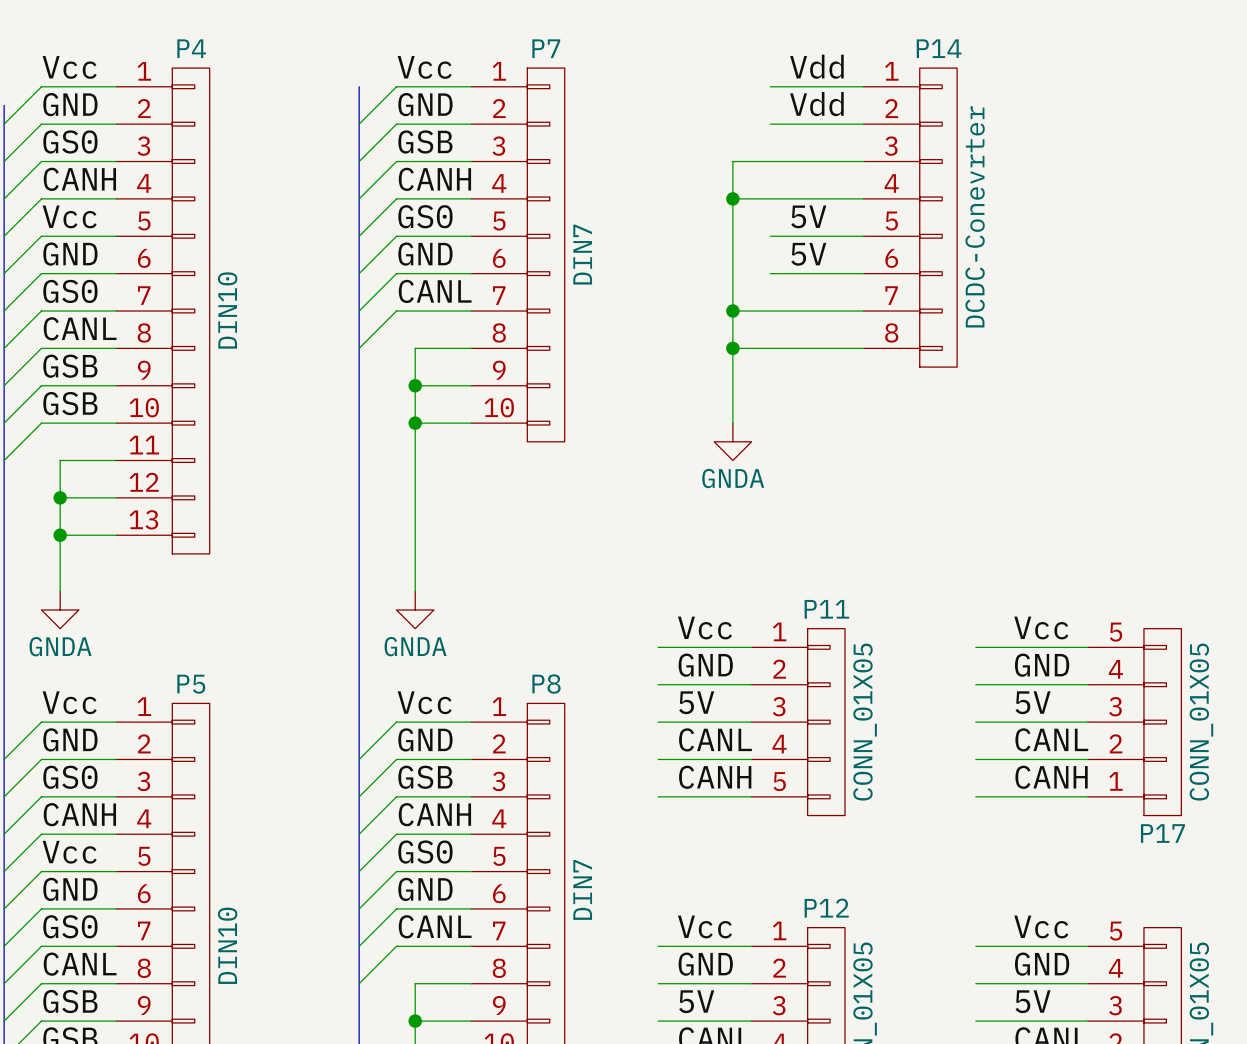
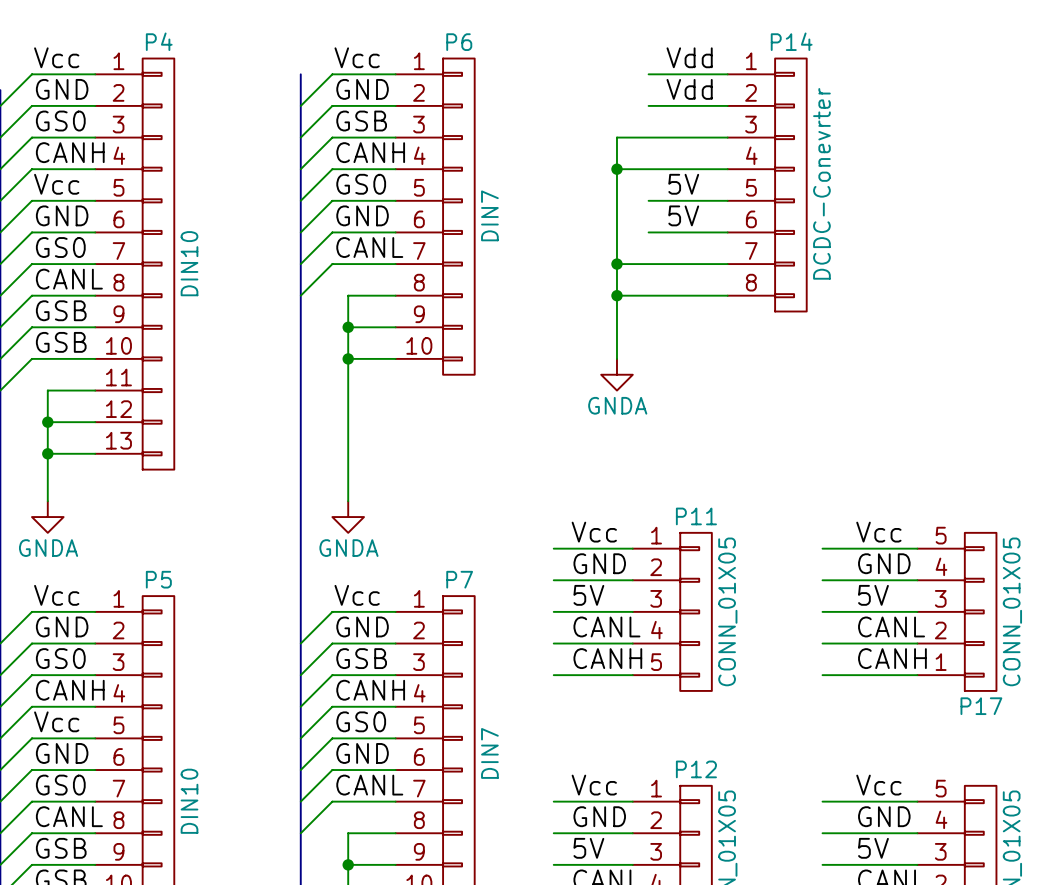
P7 name: P7 (546, 48) -> P6 (459, 42)
P8 name: P8 (546, 684) -> P7 (459, 579)

